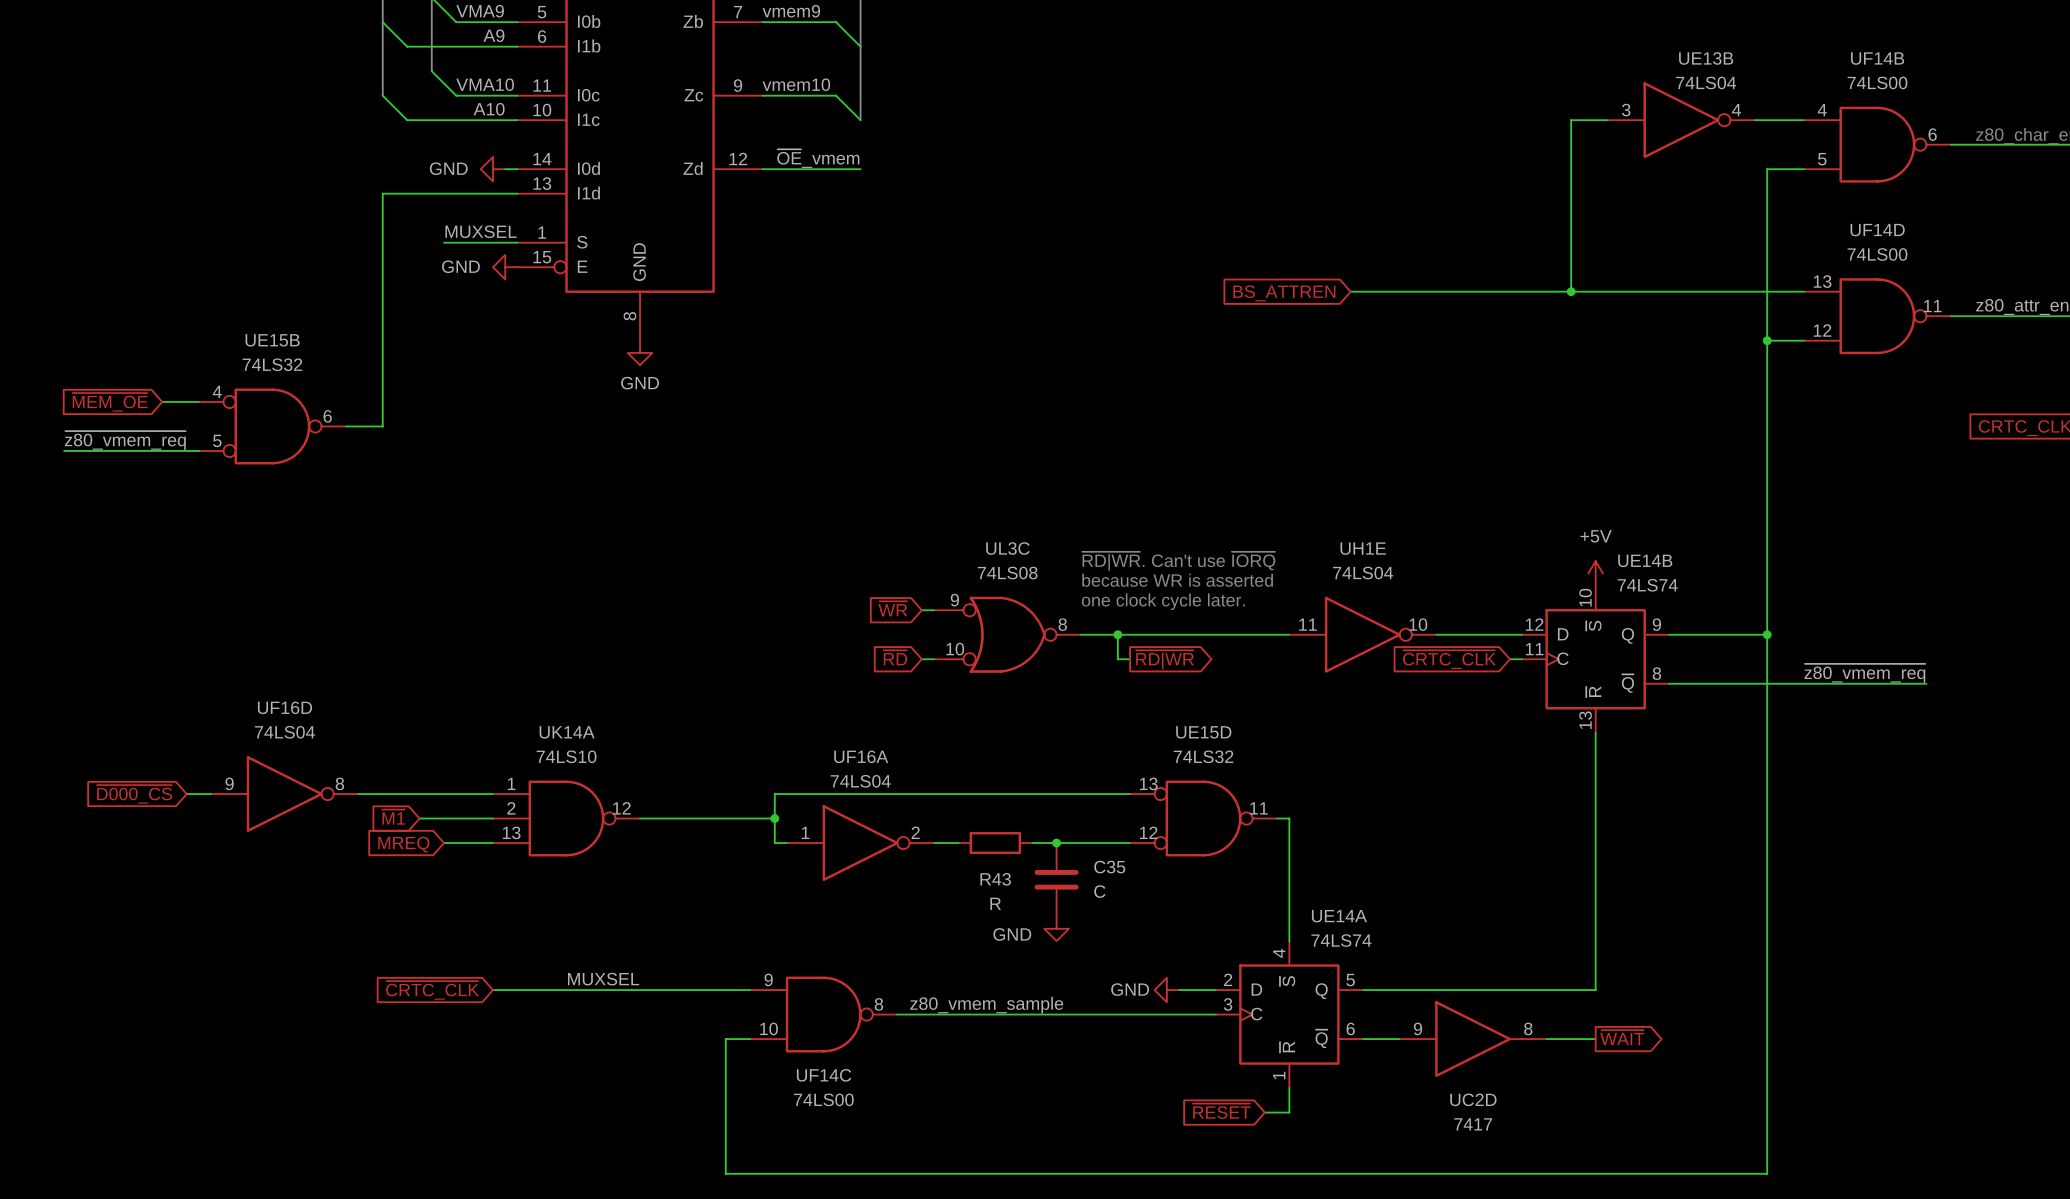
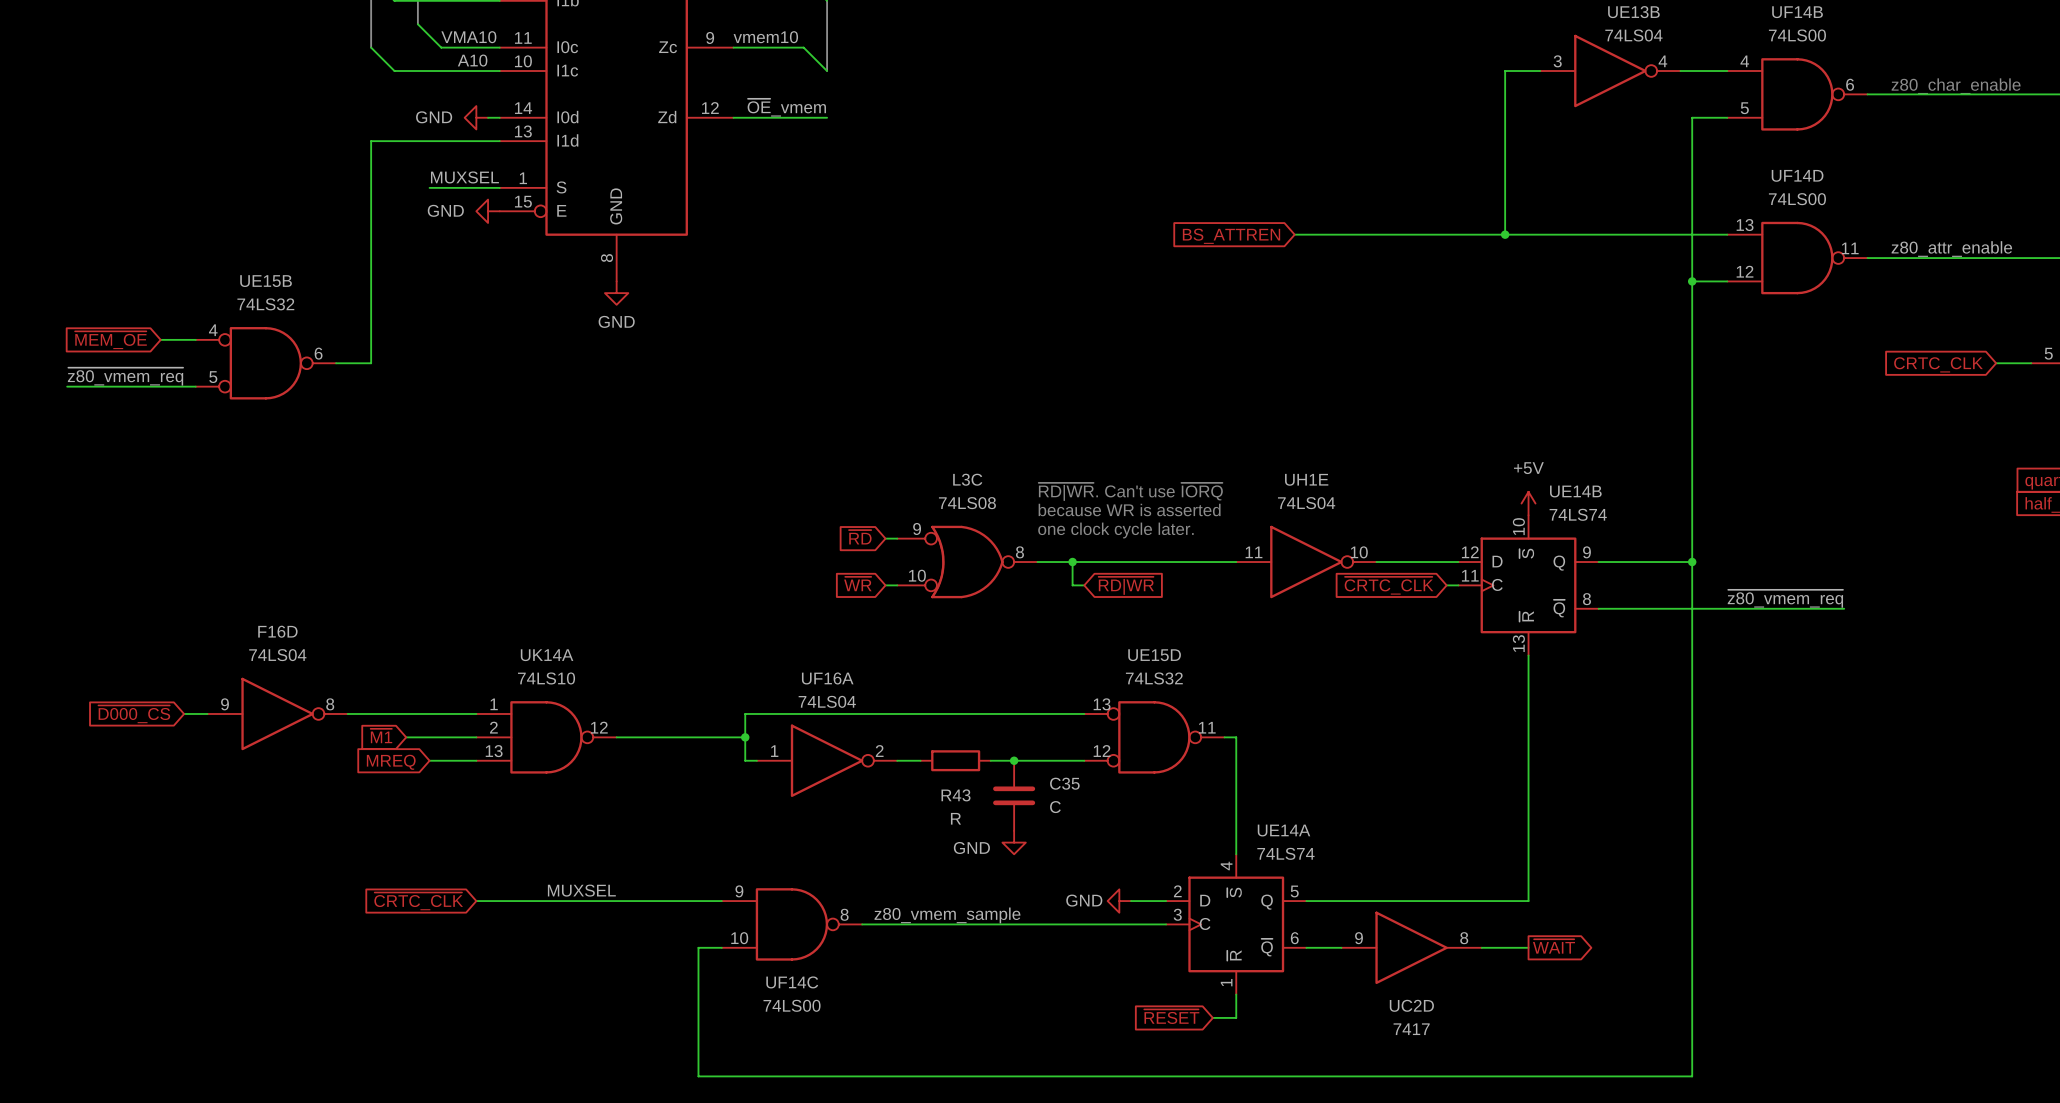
UL3C name: UL3C (1007, 548) -> L3C (967, 479)
global label: ~{WR} (892, 608) -> ~{RD} (860, 537)
global label: ~{RD} (895, 657) -> ~{WR} (857, 584)
global label shape: output (1164, 659) -> input (1126, 585)
UF16D name: UF16D (285, 707) -> F16D (277, 631)

